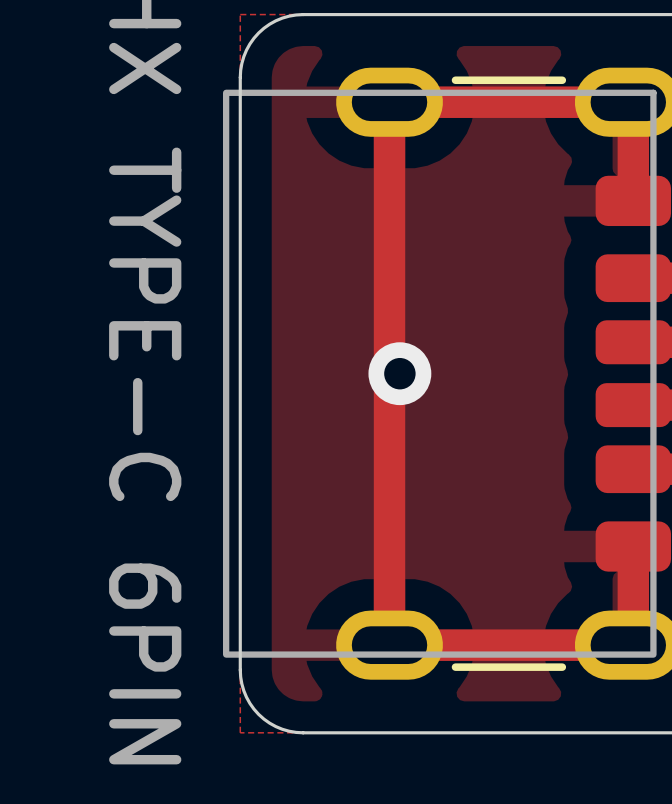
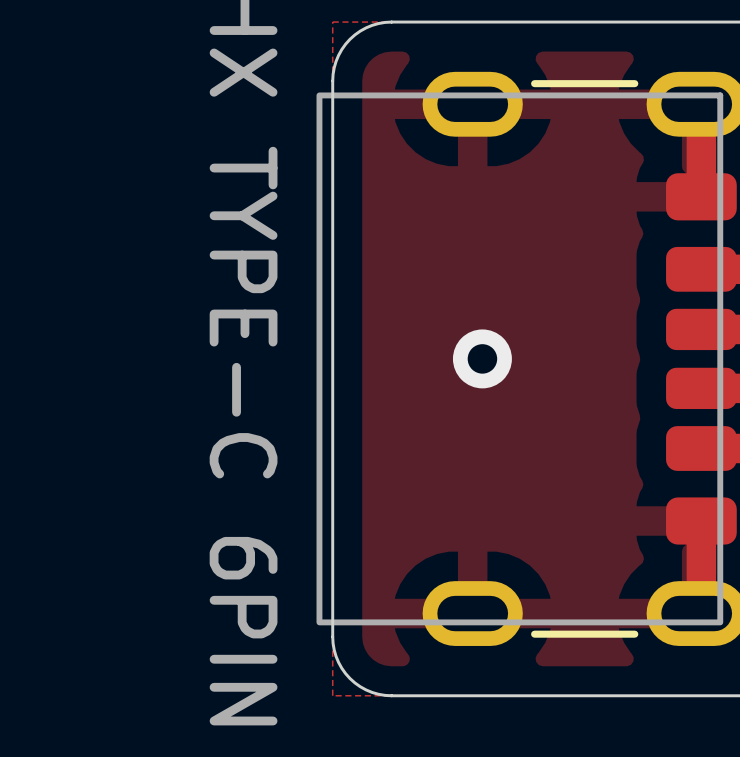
track: (628, 102) (389, 102) (389, 363) (399, 373) (389, 384) (389, 645) (628, 645) -> none

